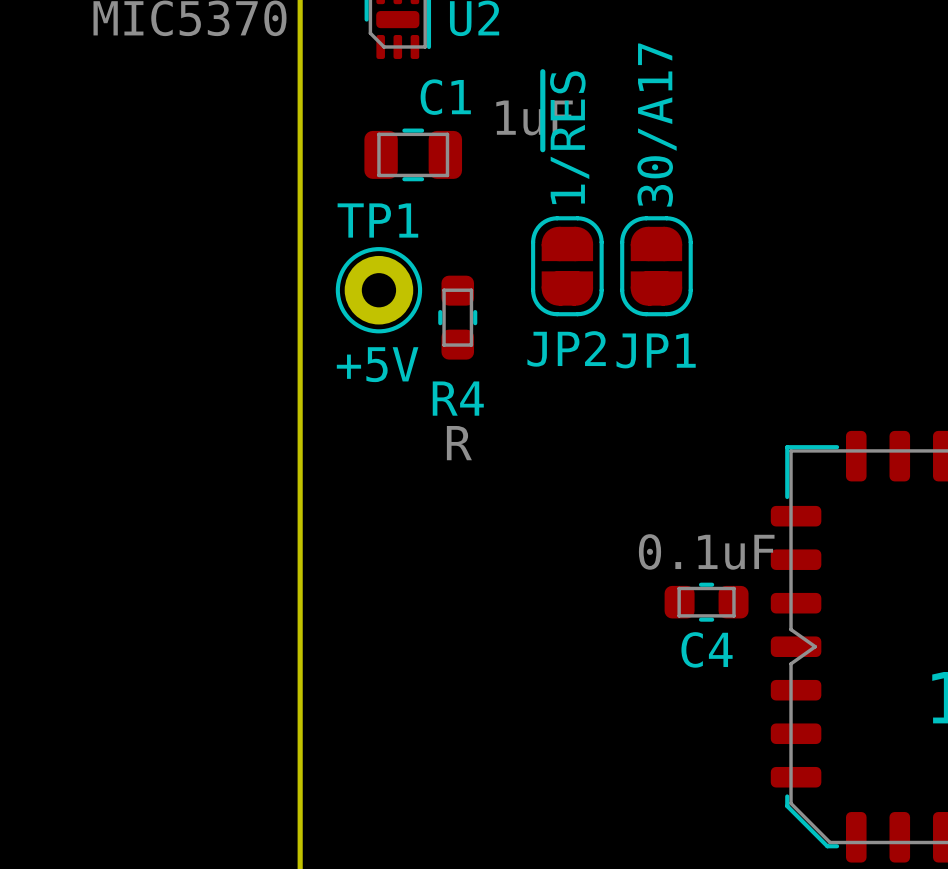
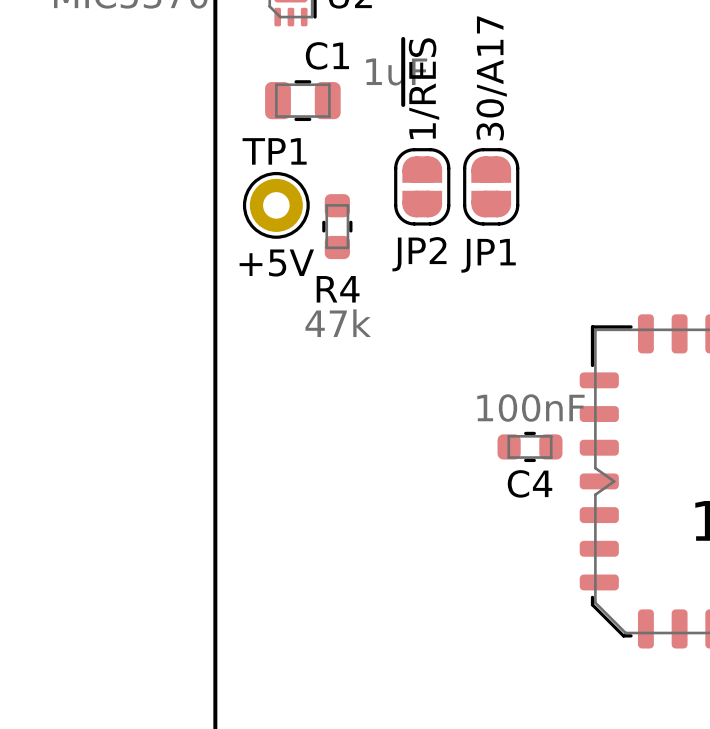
R4 value: R (459, 443) -> 47k (338, 323)
C4 value: 0.1uF (706, 551) -> 100nF (530, 408)

